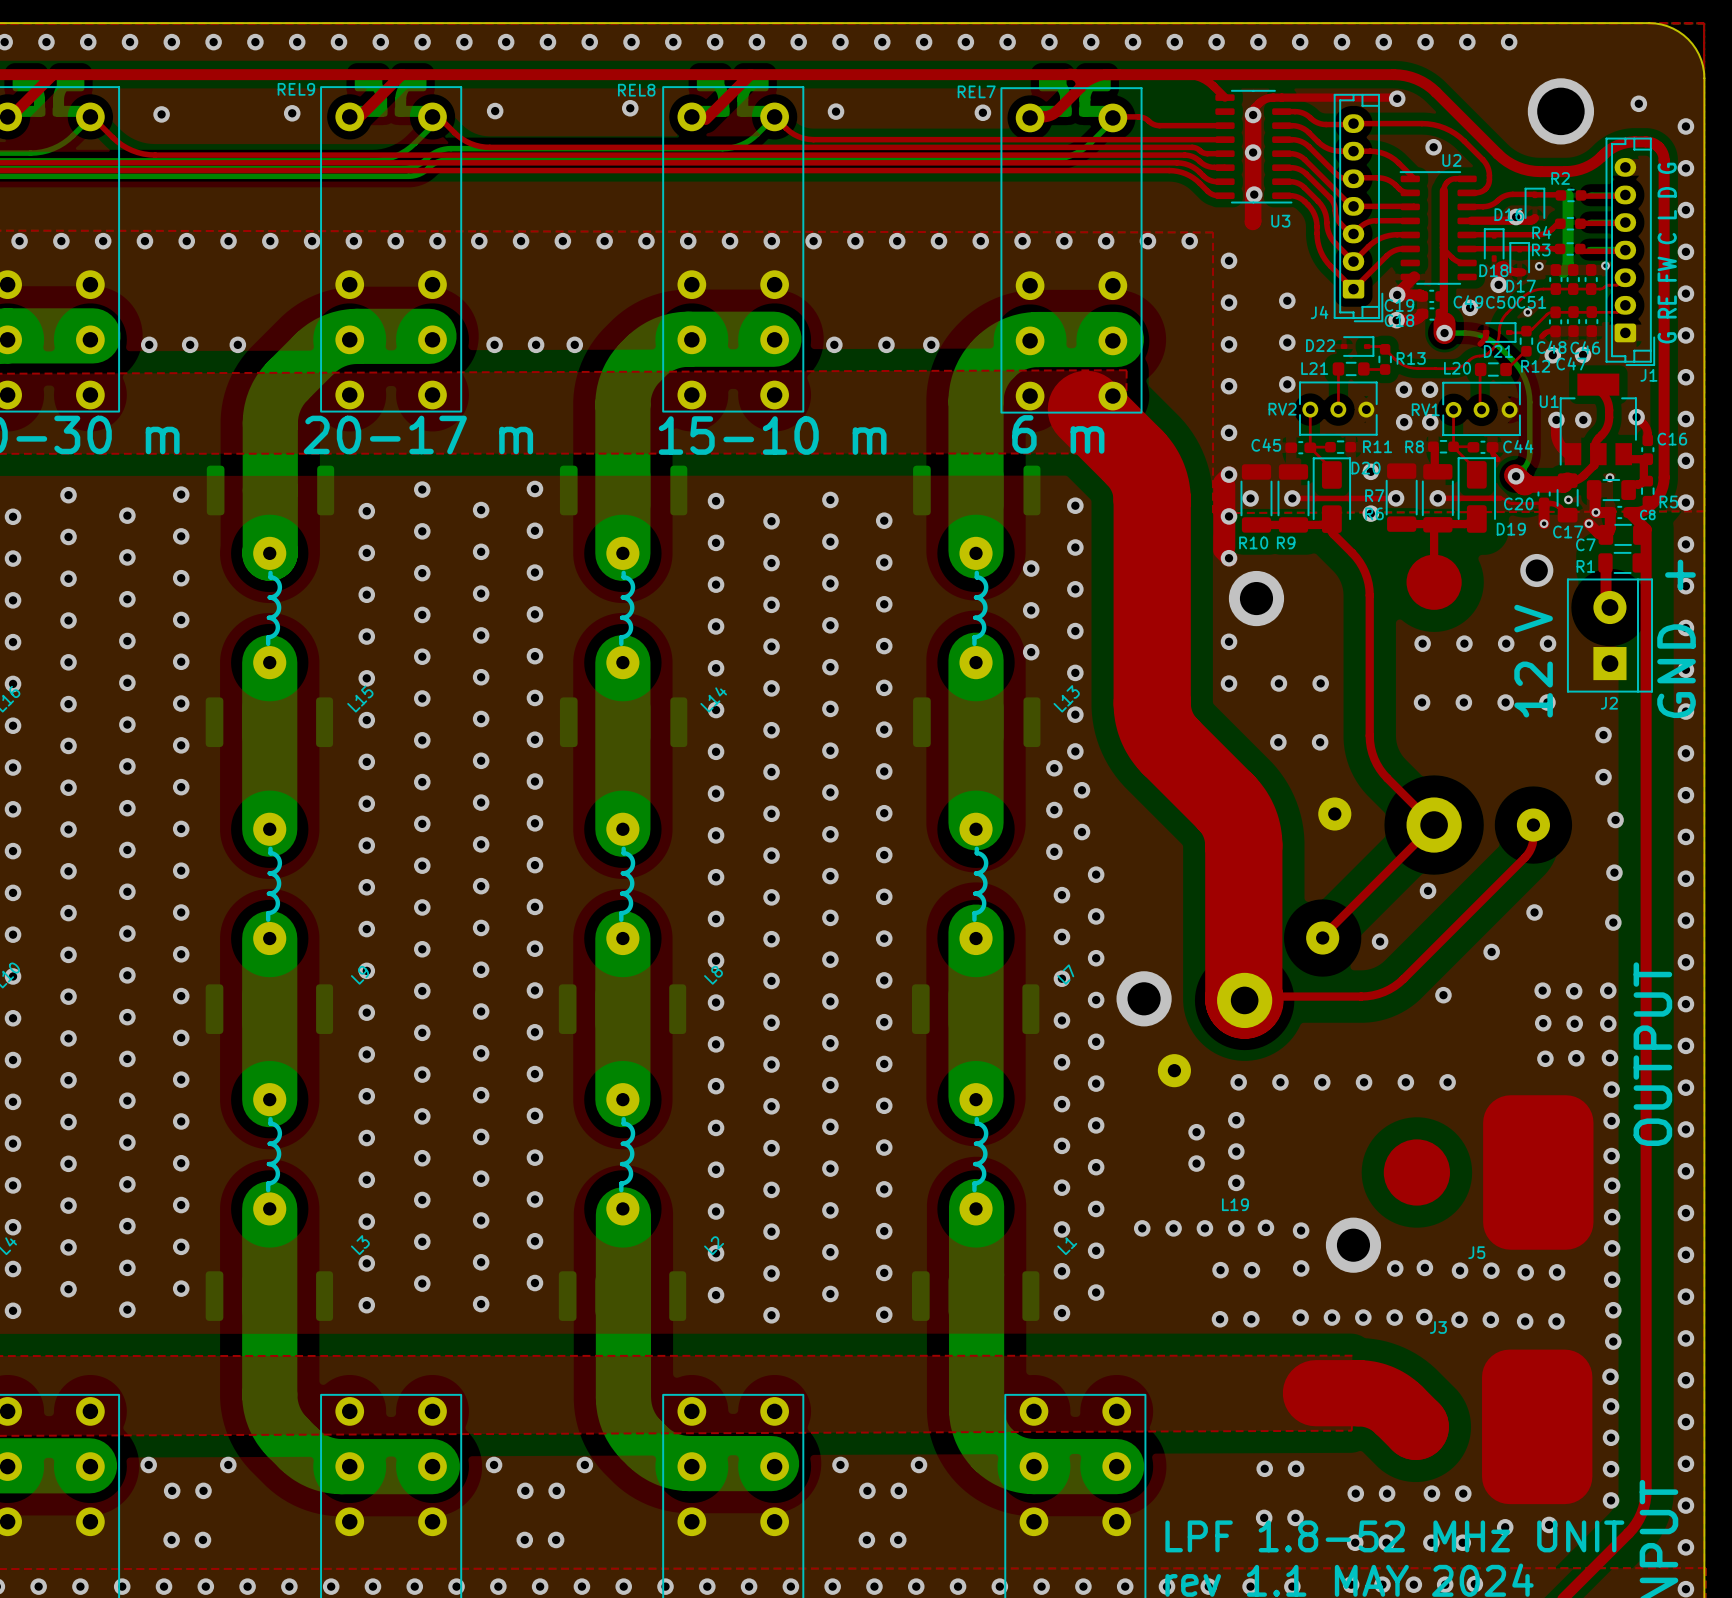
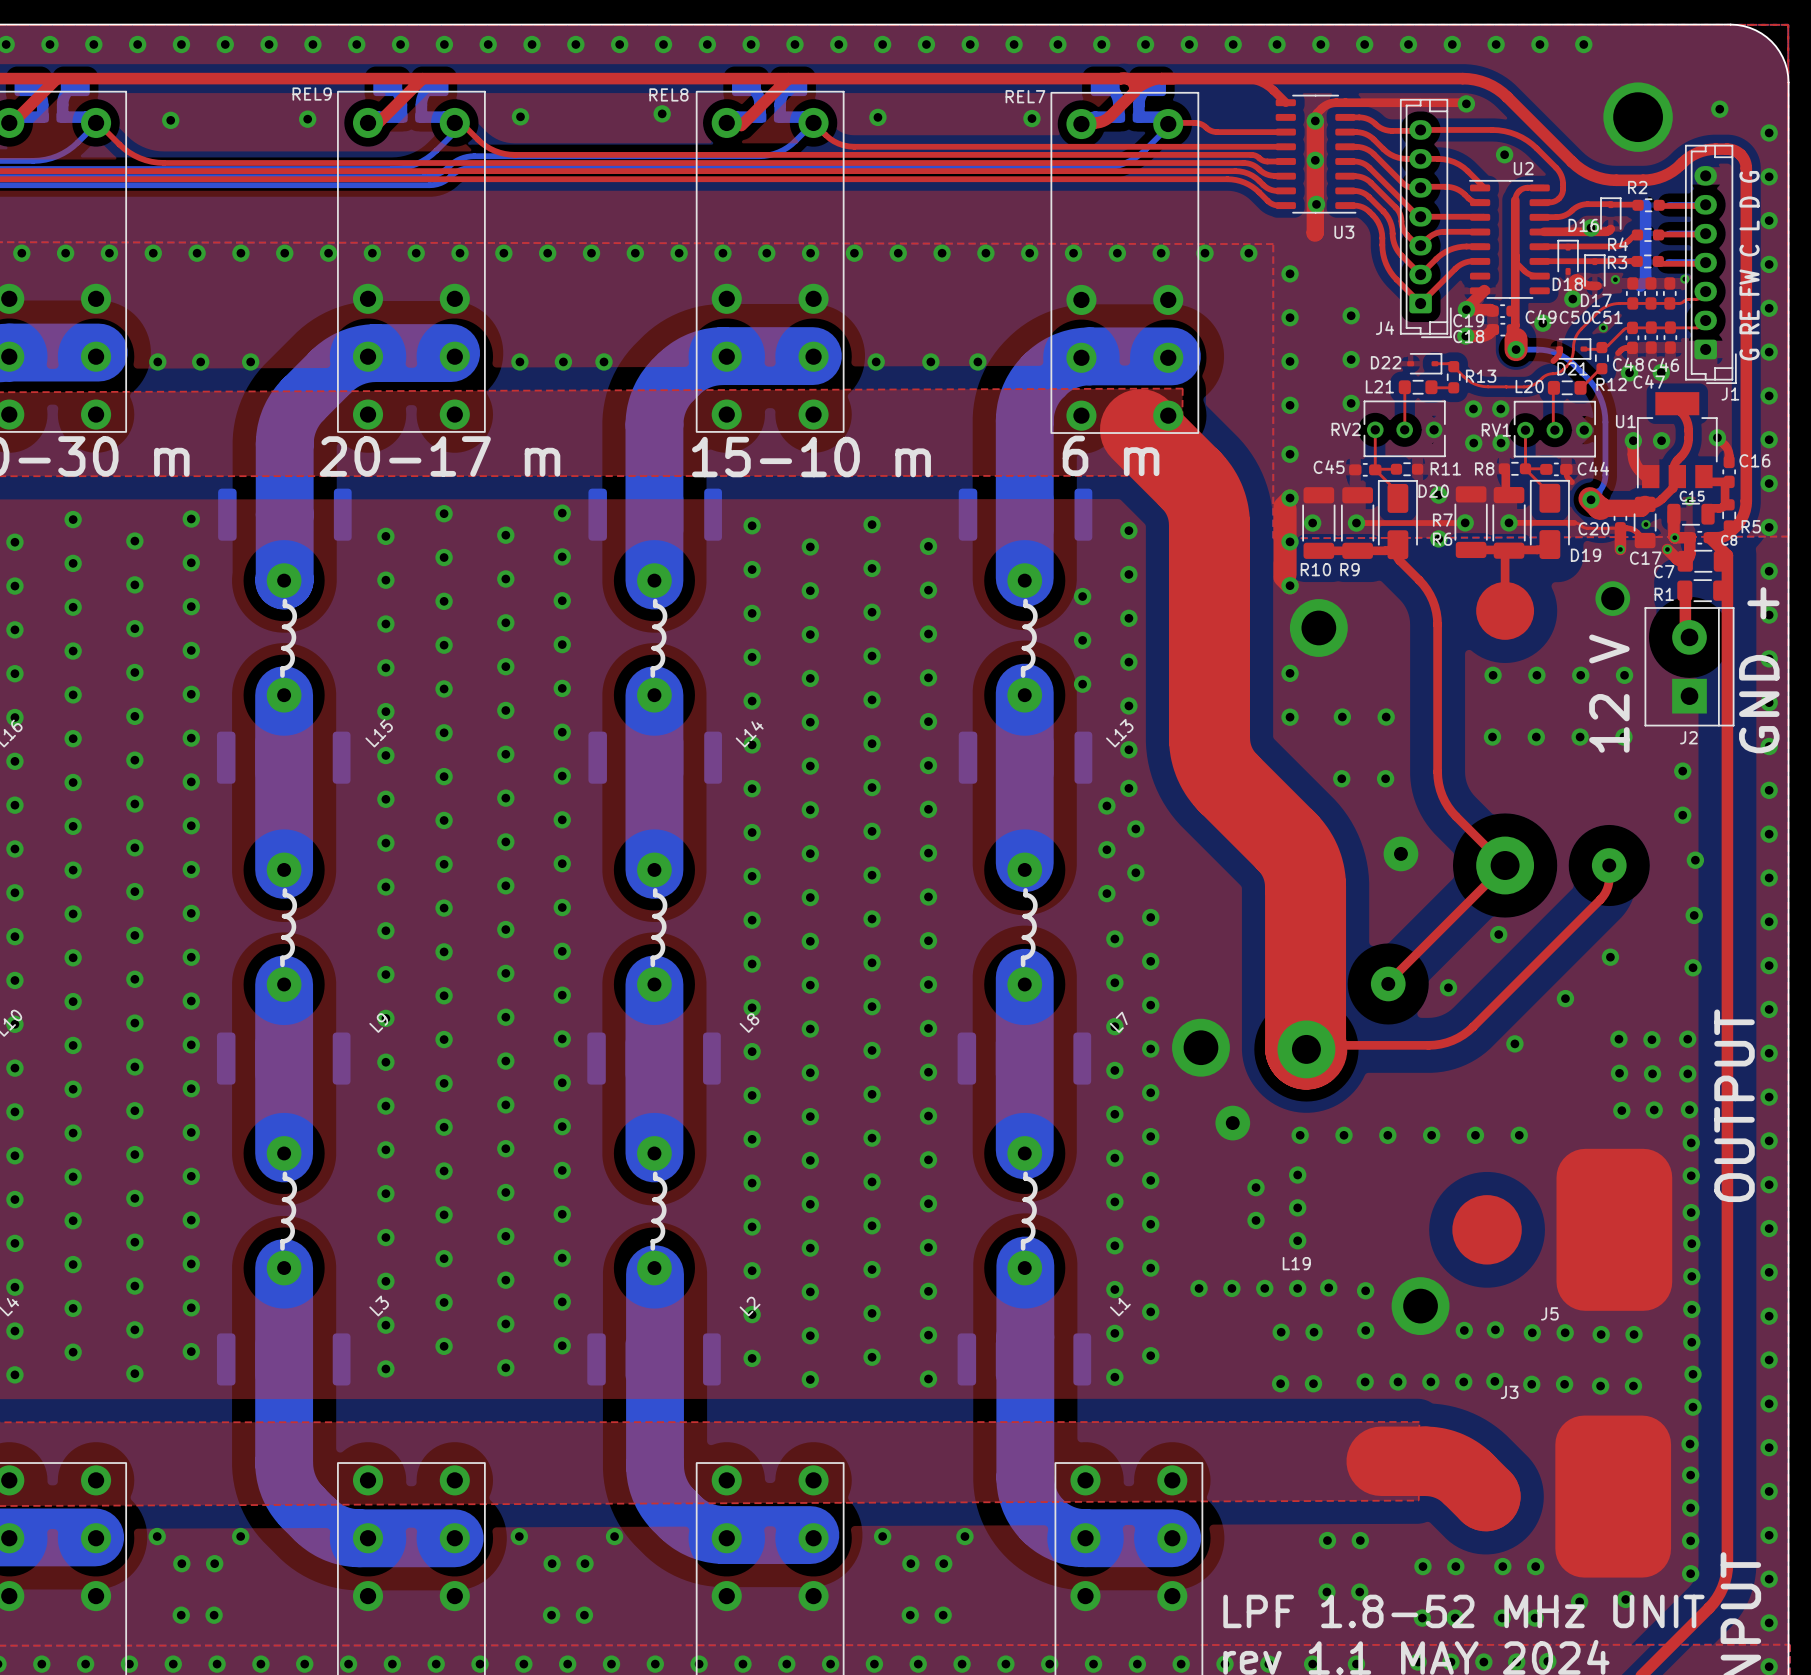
part: (1611, 490) -> none
C15: none -> (1690, 514)

